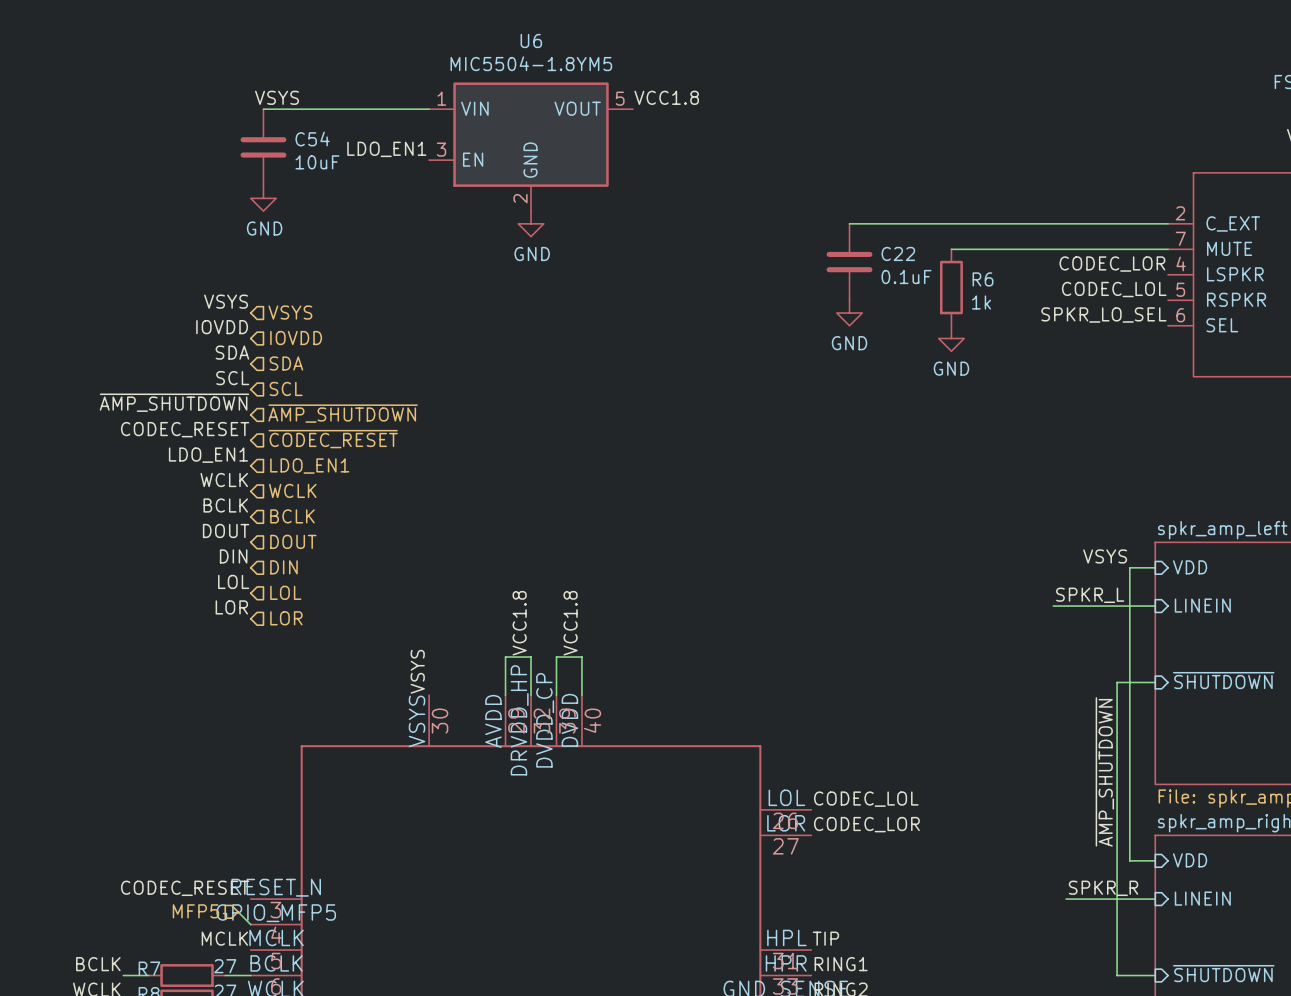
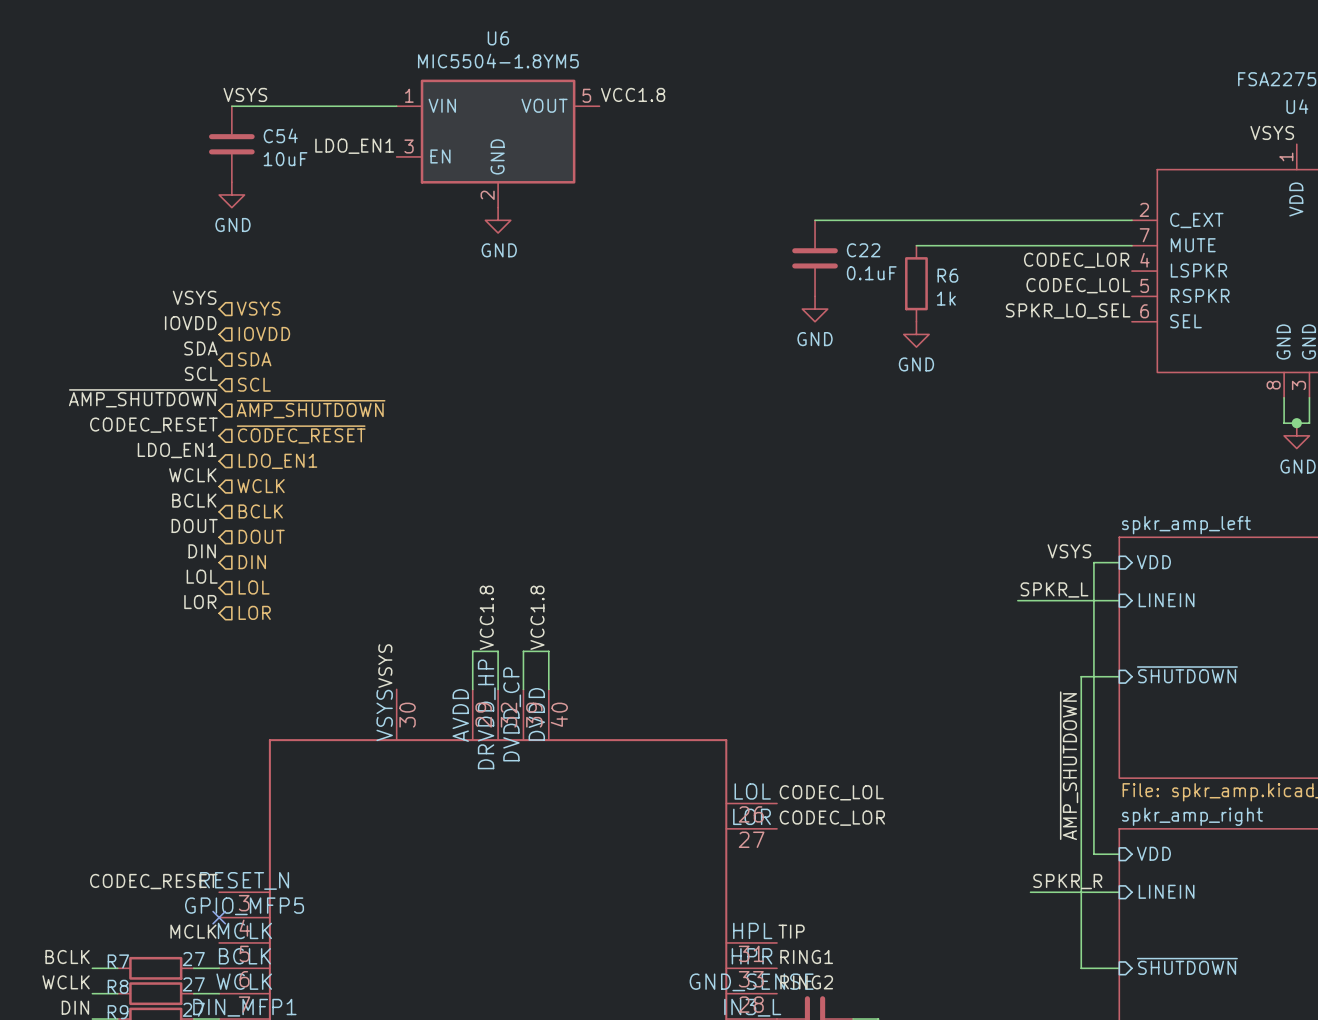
hierarchical label: MFP5 (195, 911) -> none
no-connect mark: none -> (219, 917)

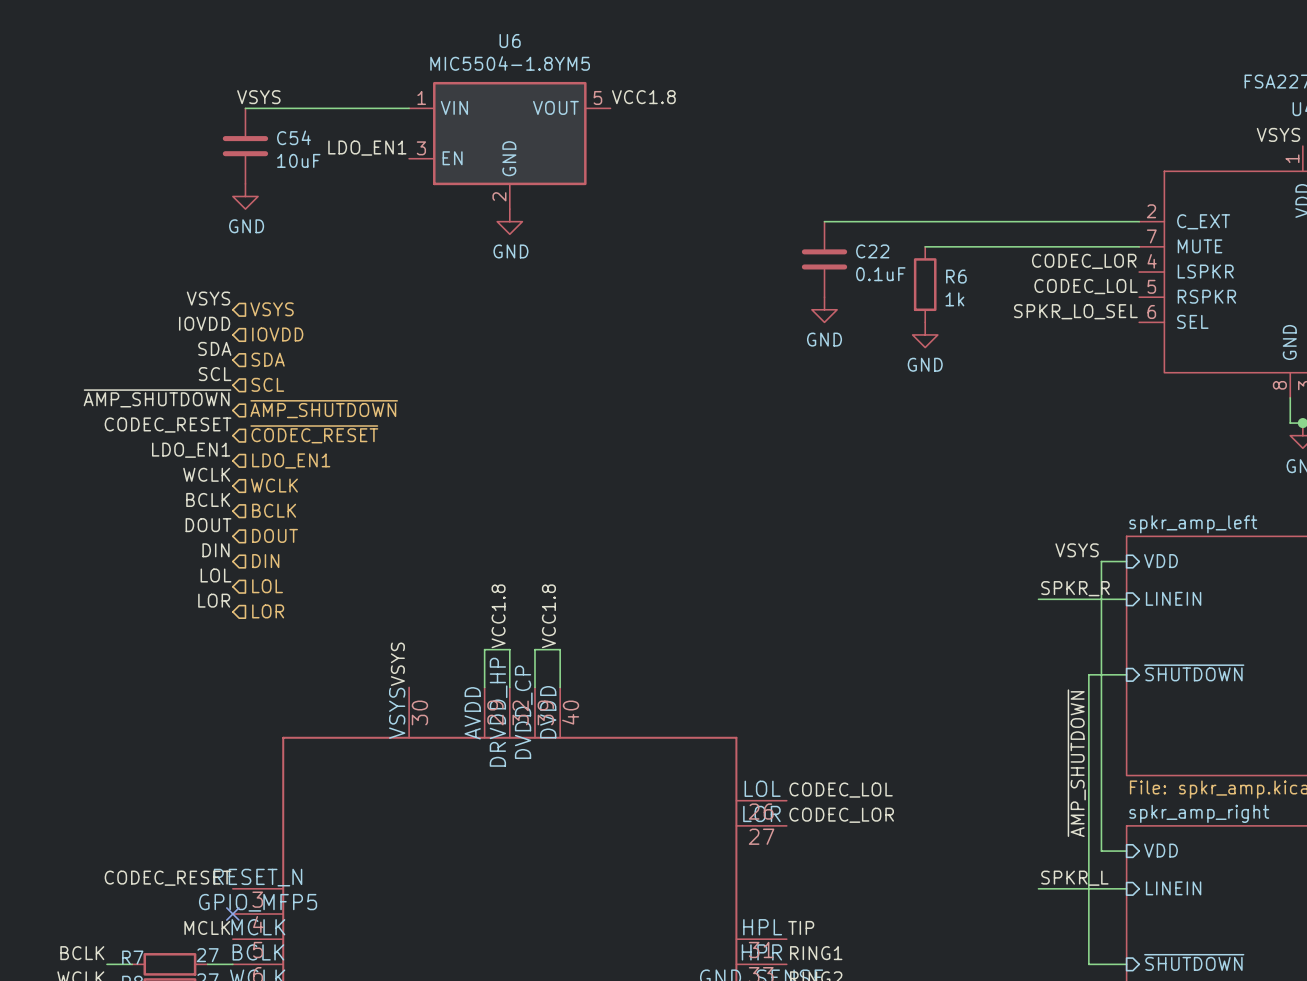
label: SPKR_L (1054, 589) -> SPKR_R (1075, 588)
wire: (1017, 600) (1030, 600) -> none
label: SPKR_R (1067, 881) -> SPKR_L (1074, 878)

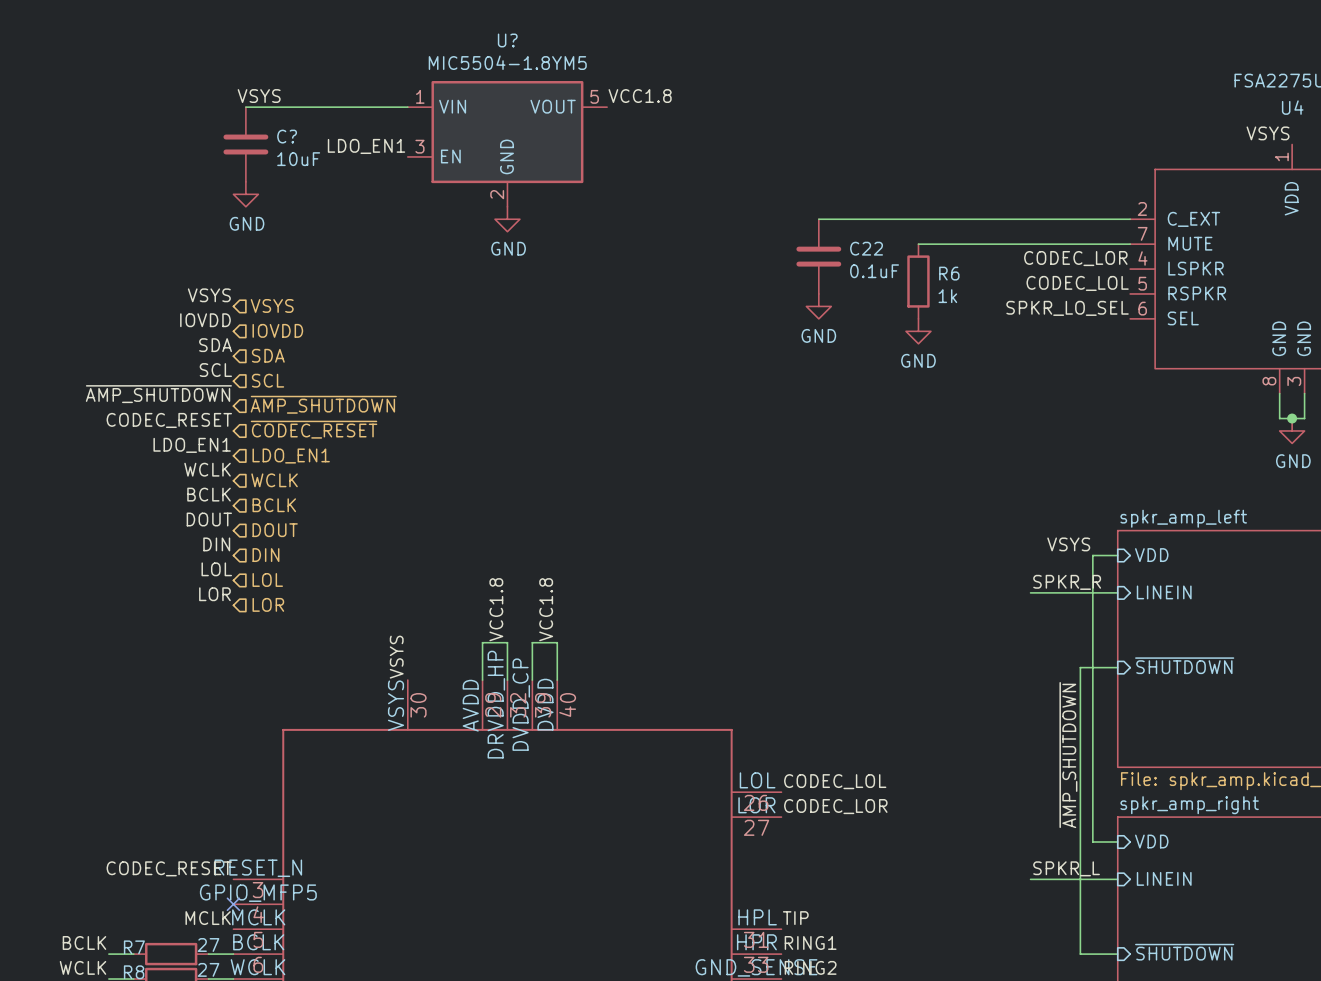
U6 name: U6 (510, 41) -> U? (507, 40)
C54 name: C54 (293, 137) -> C? (287, 136)

